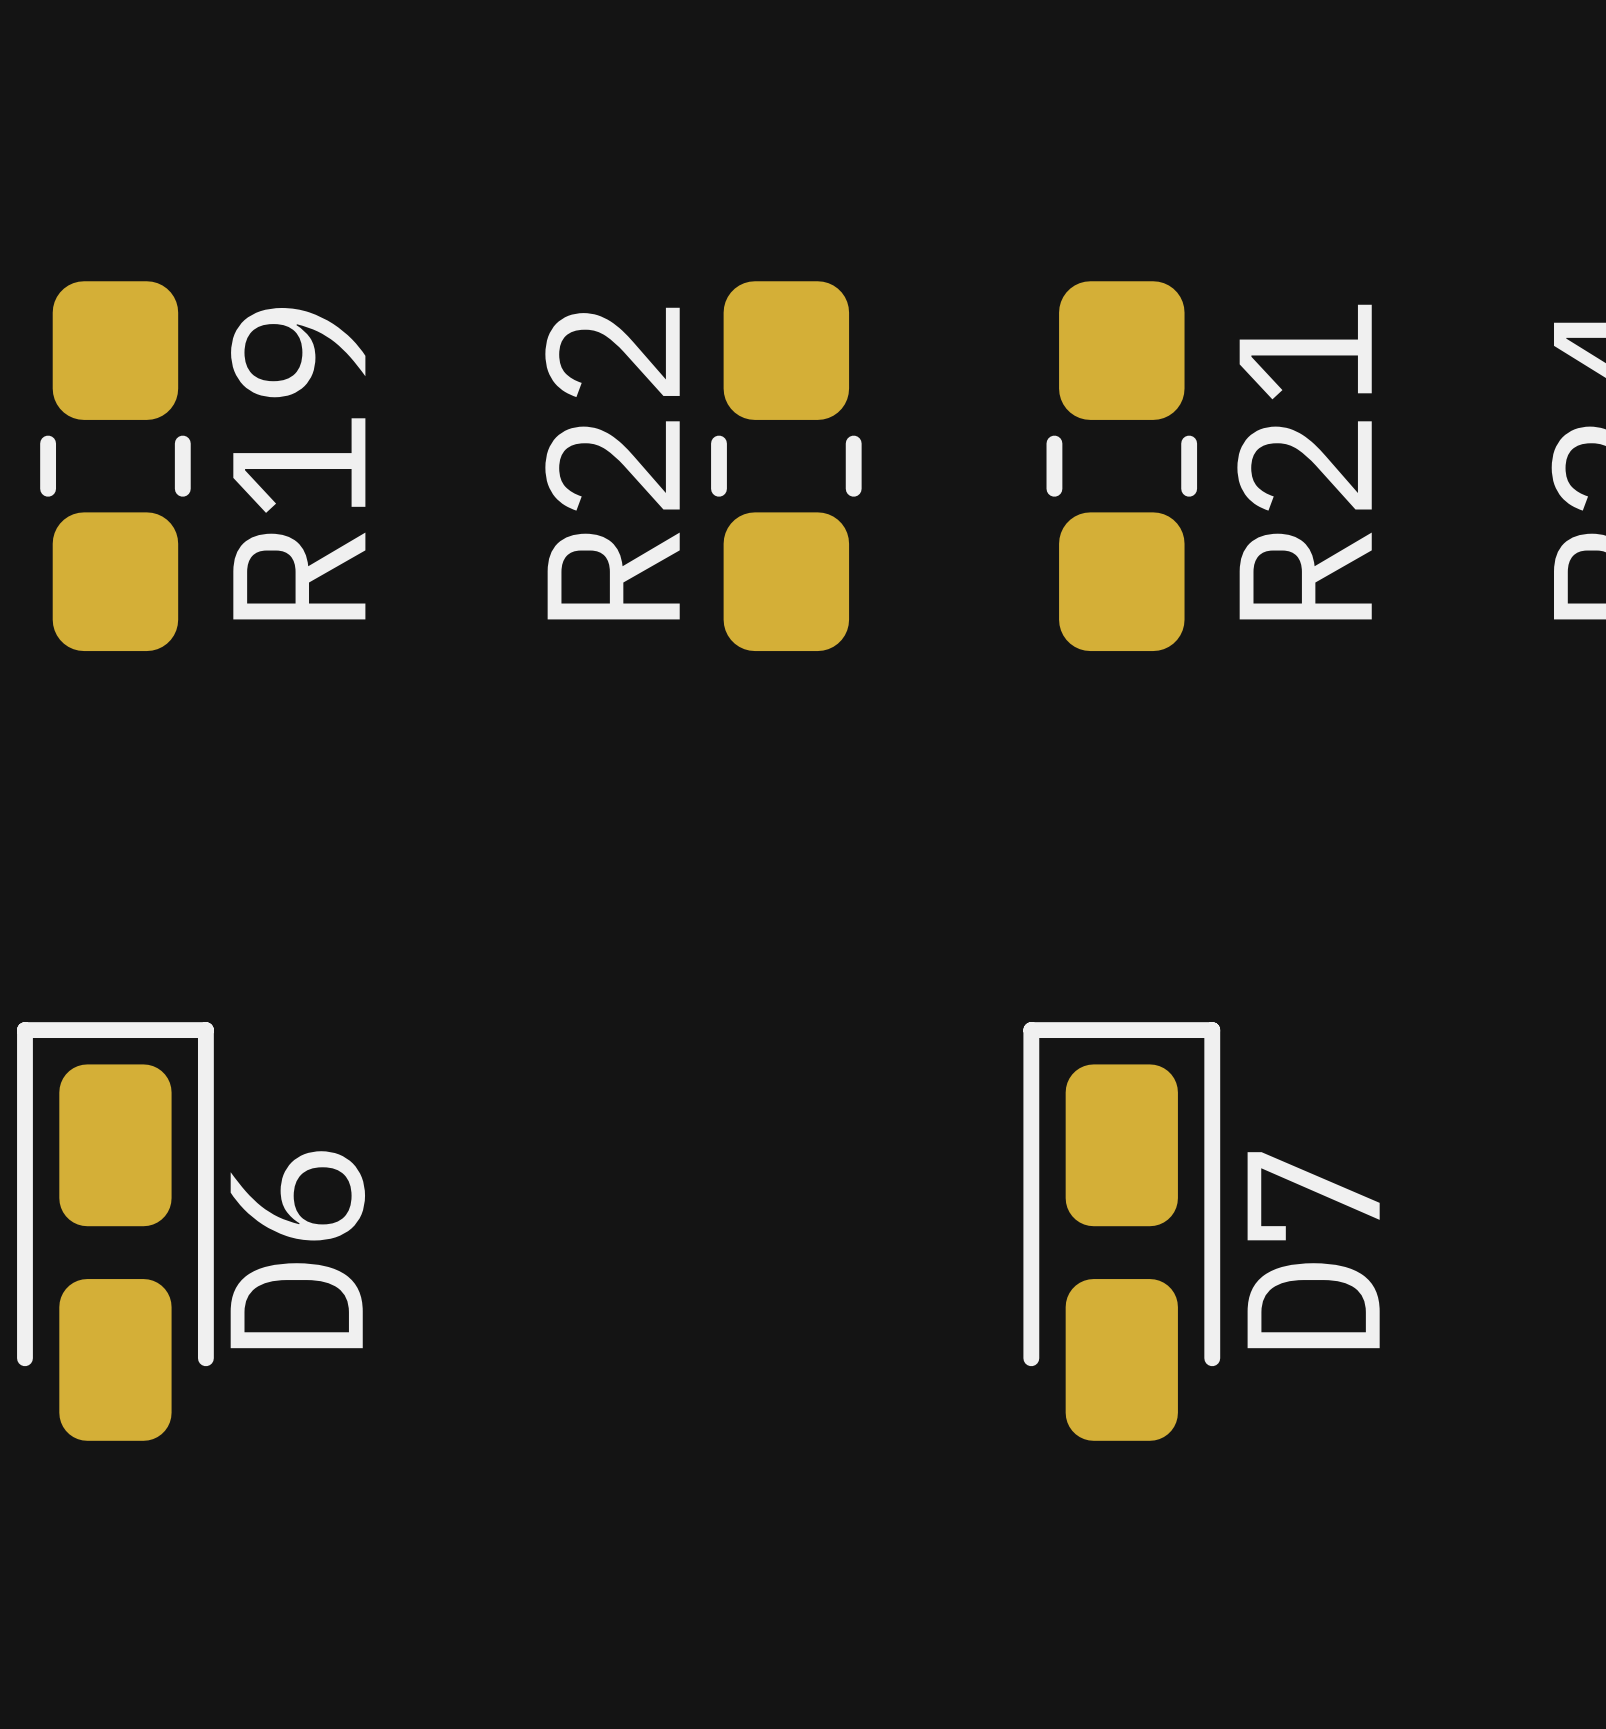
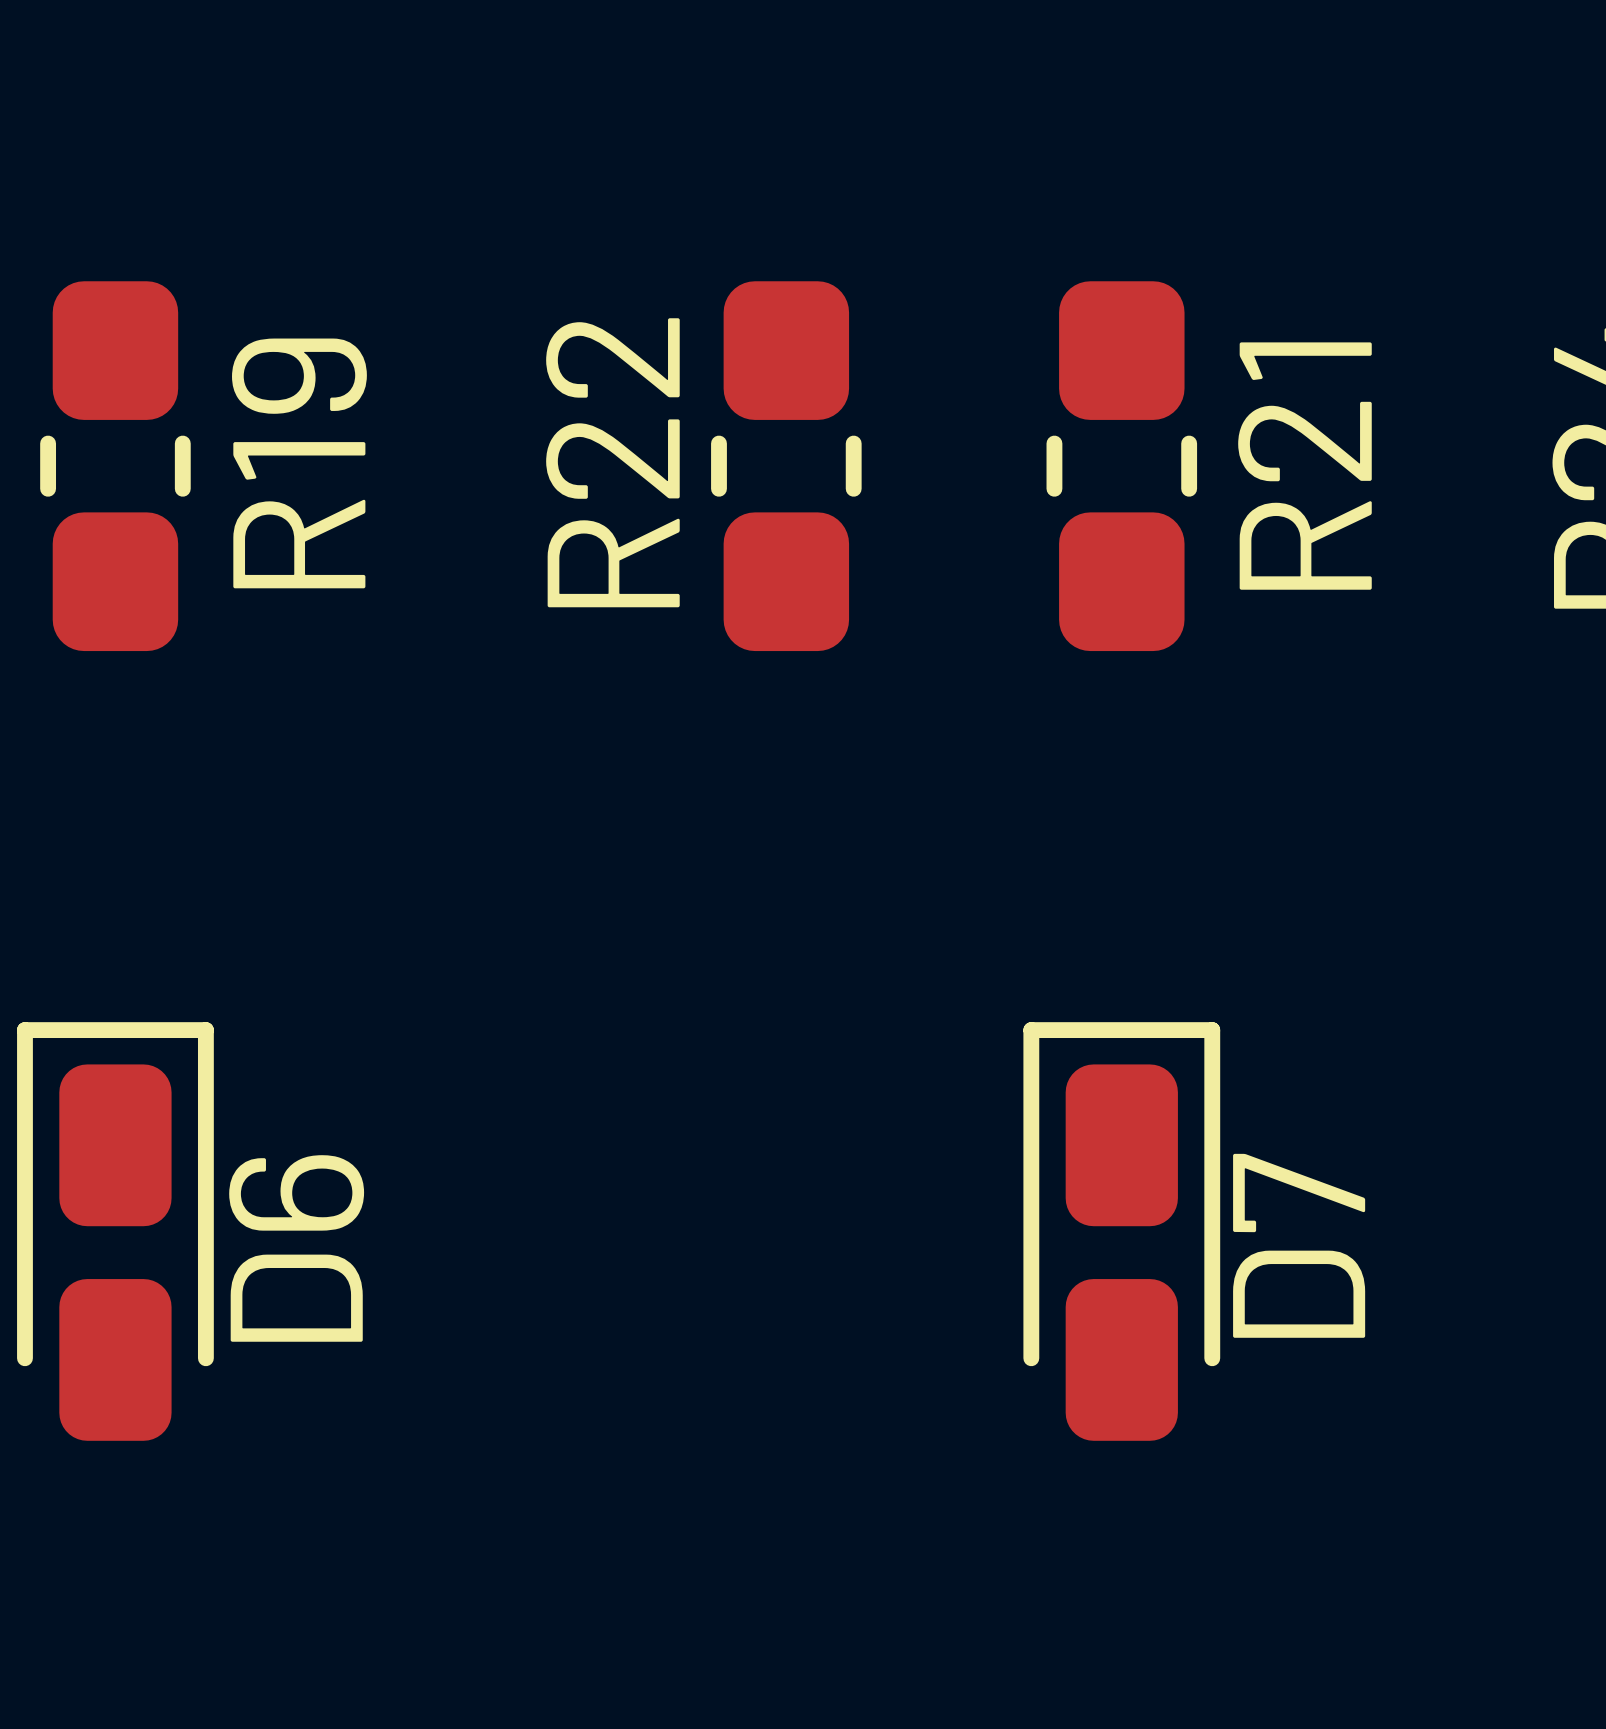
D7 name position: D7 (1313, 1250) -> D7 (1299, 1245)

